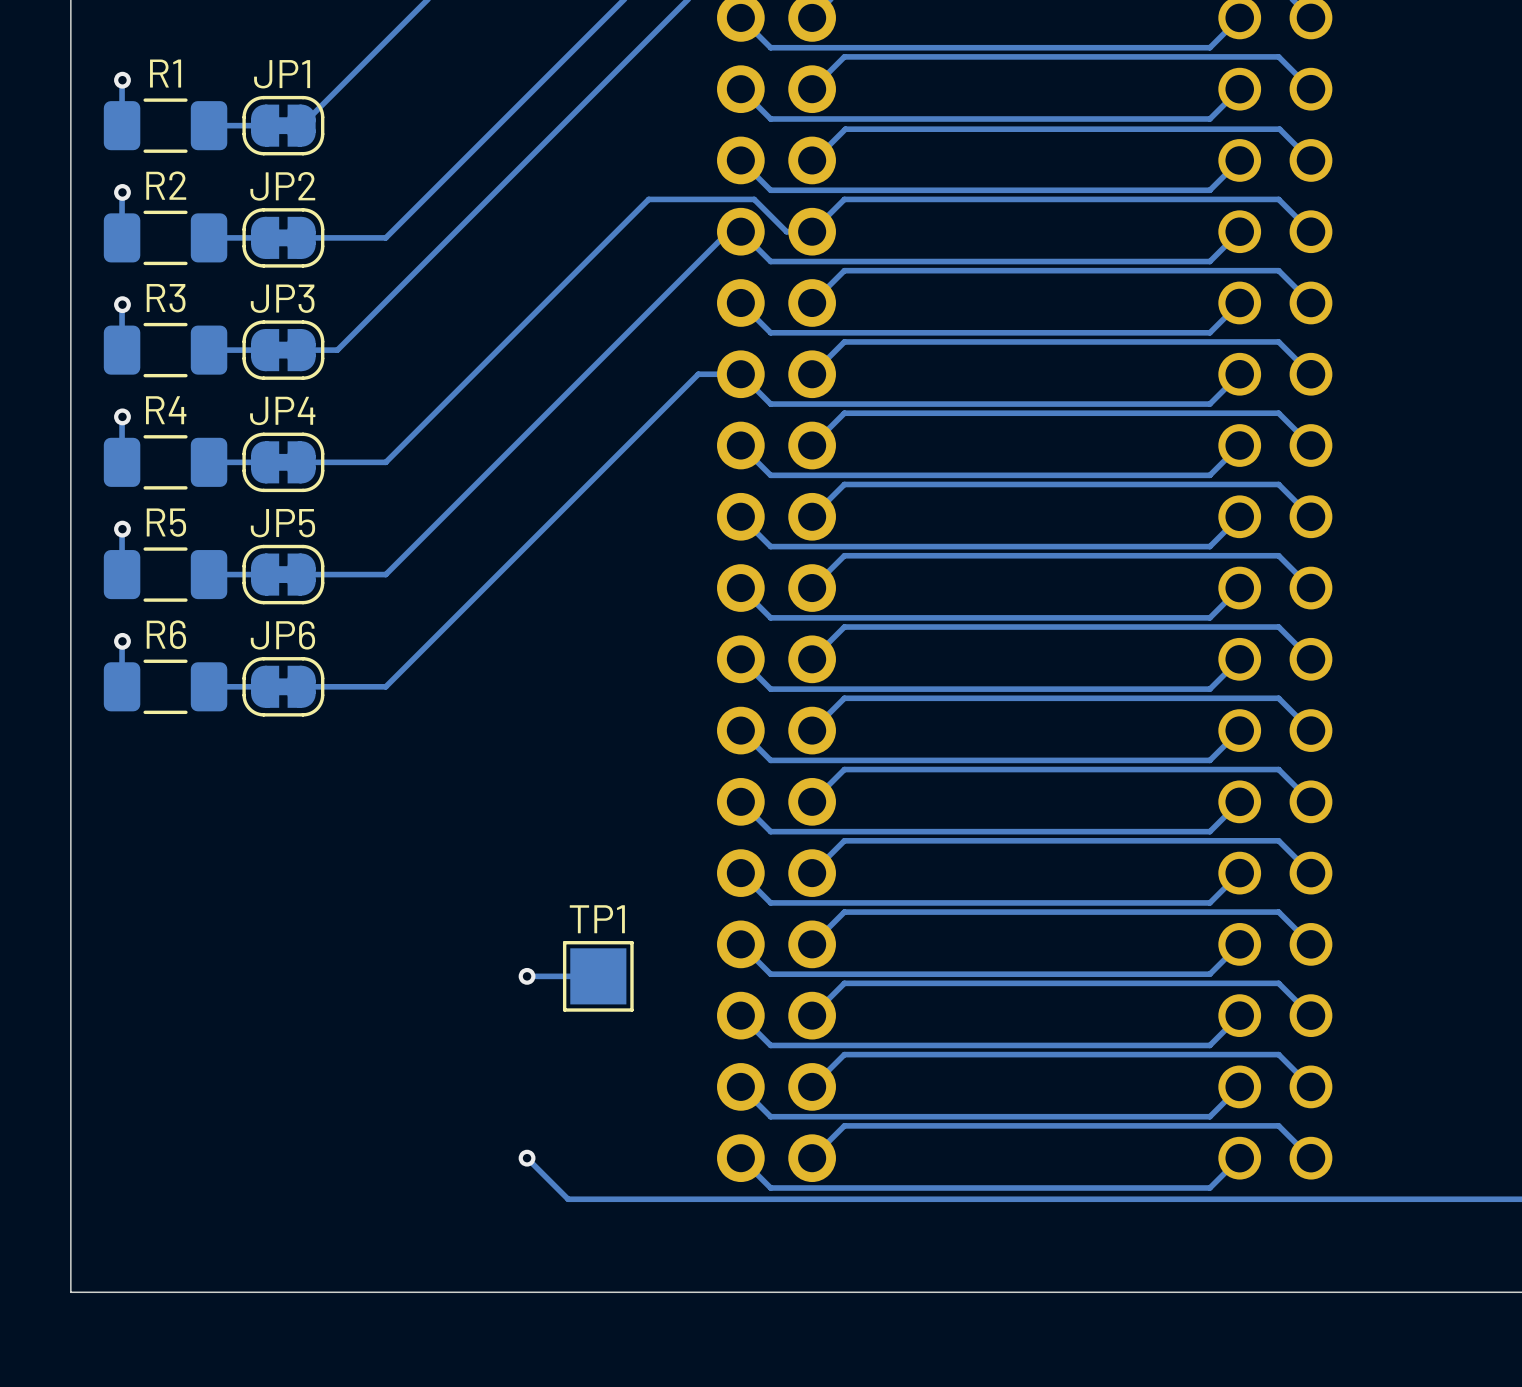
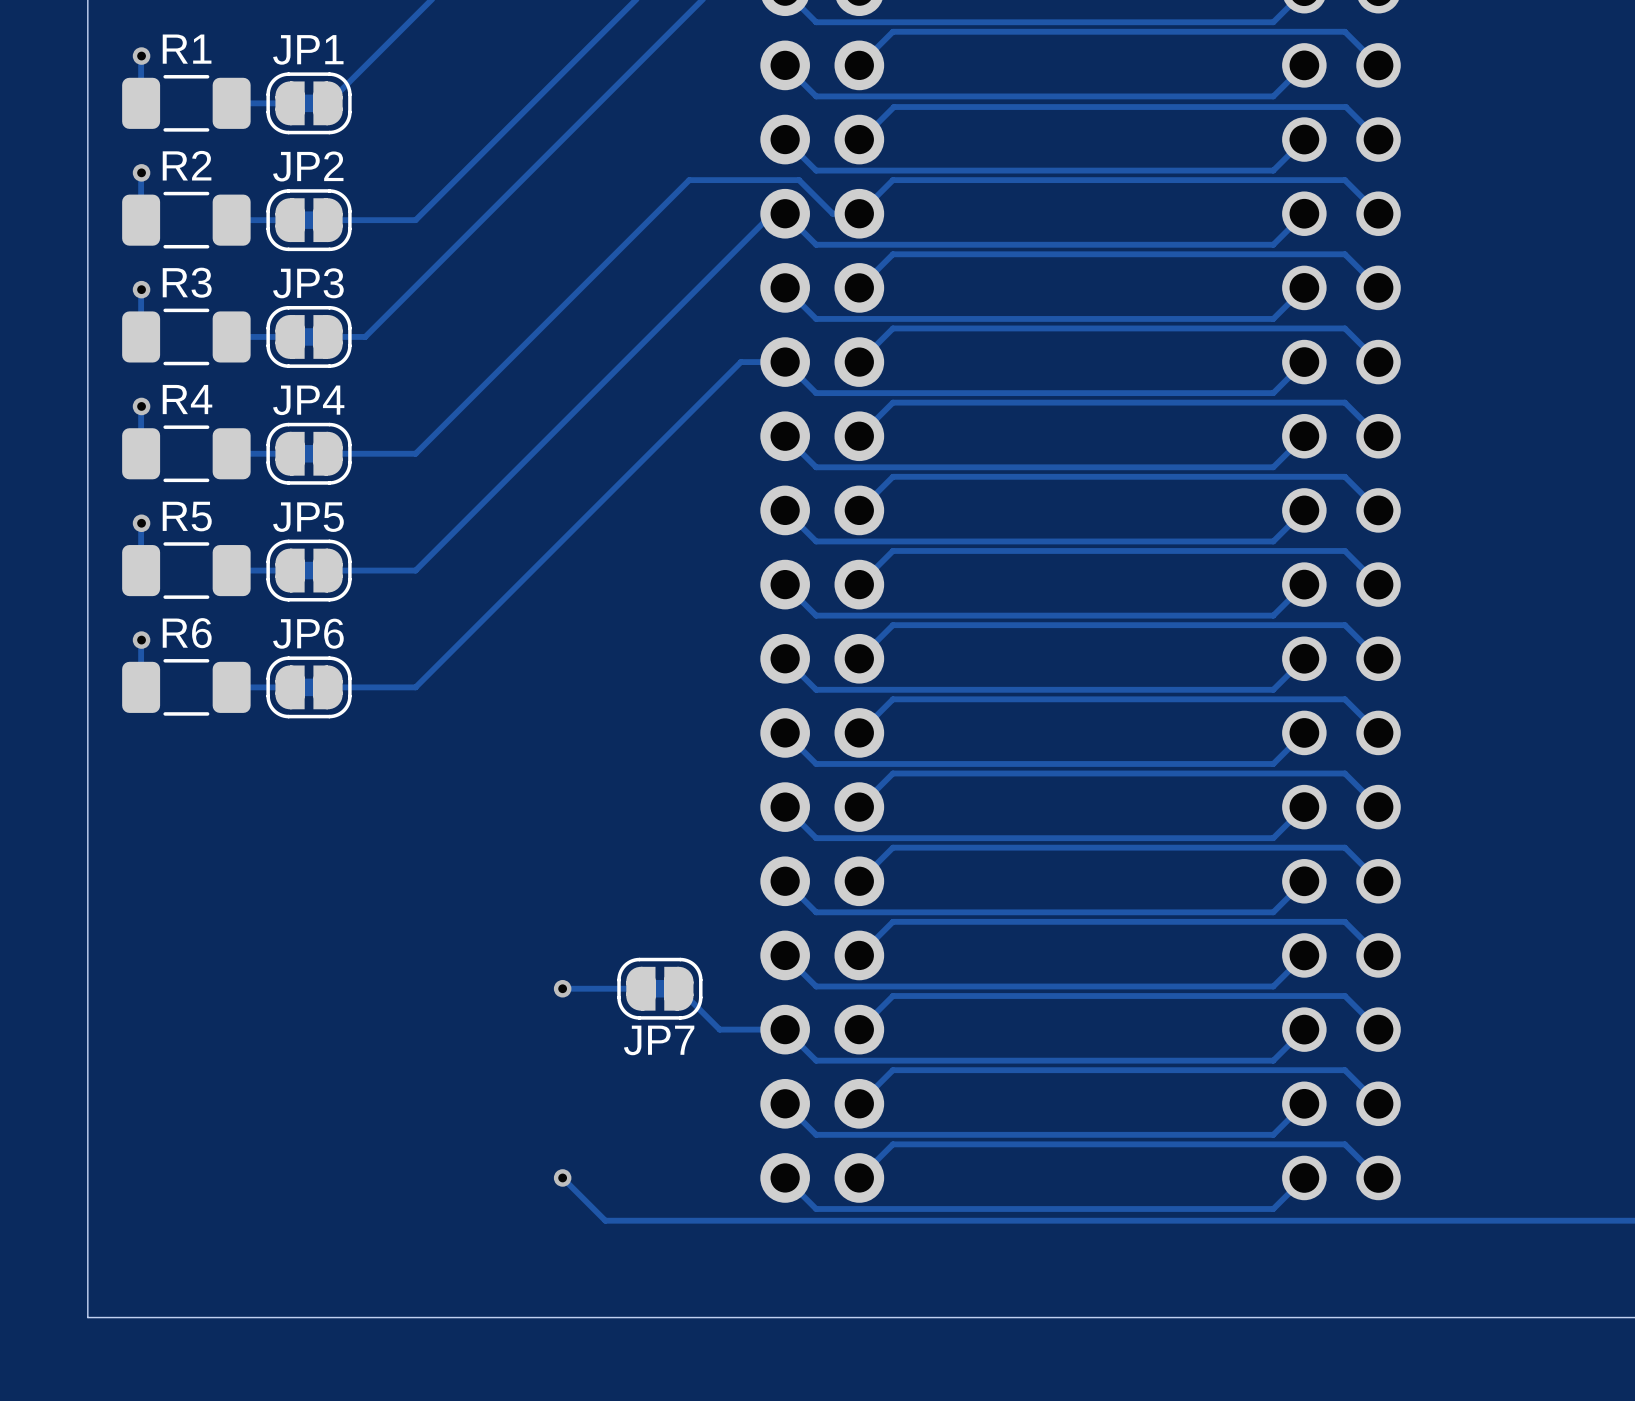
TP1: (598, 976) -> none
JP7: none -> (659, 988)
track: none -> (678, 988) (719, 1029) (785, 1029)

